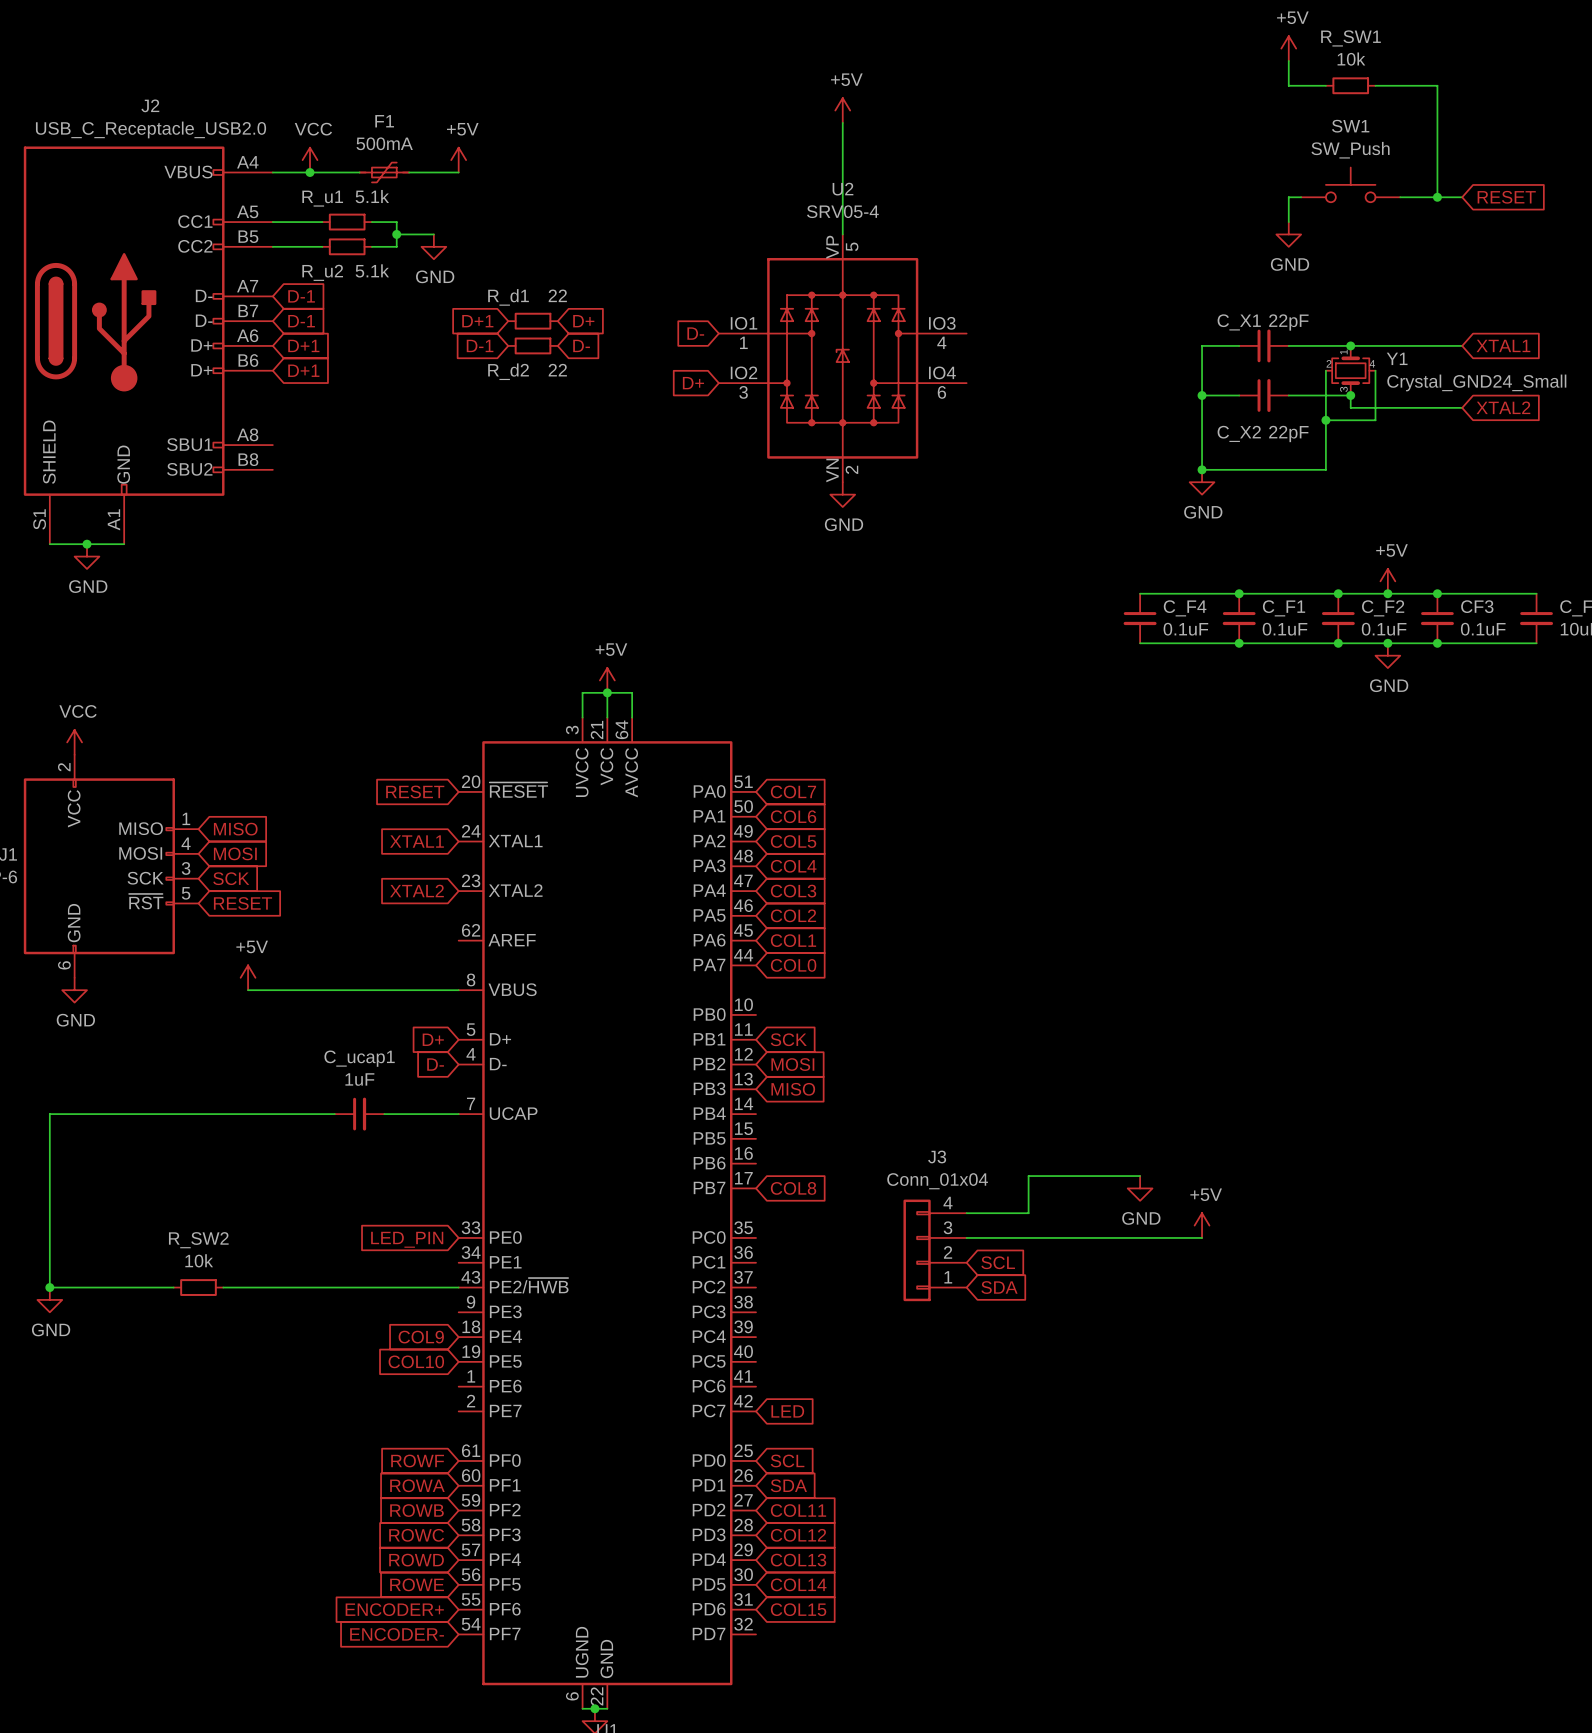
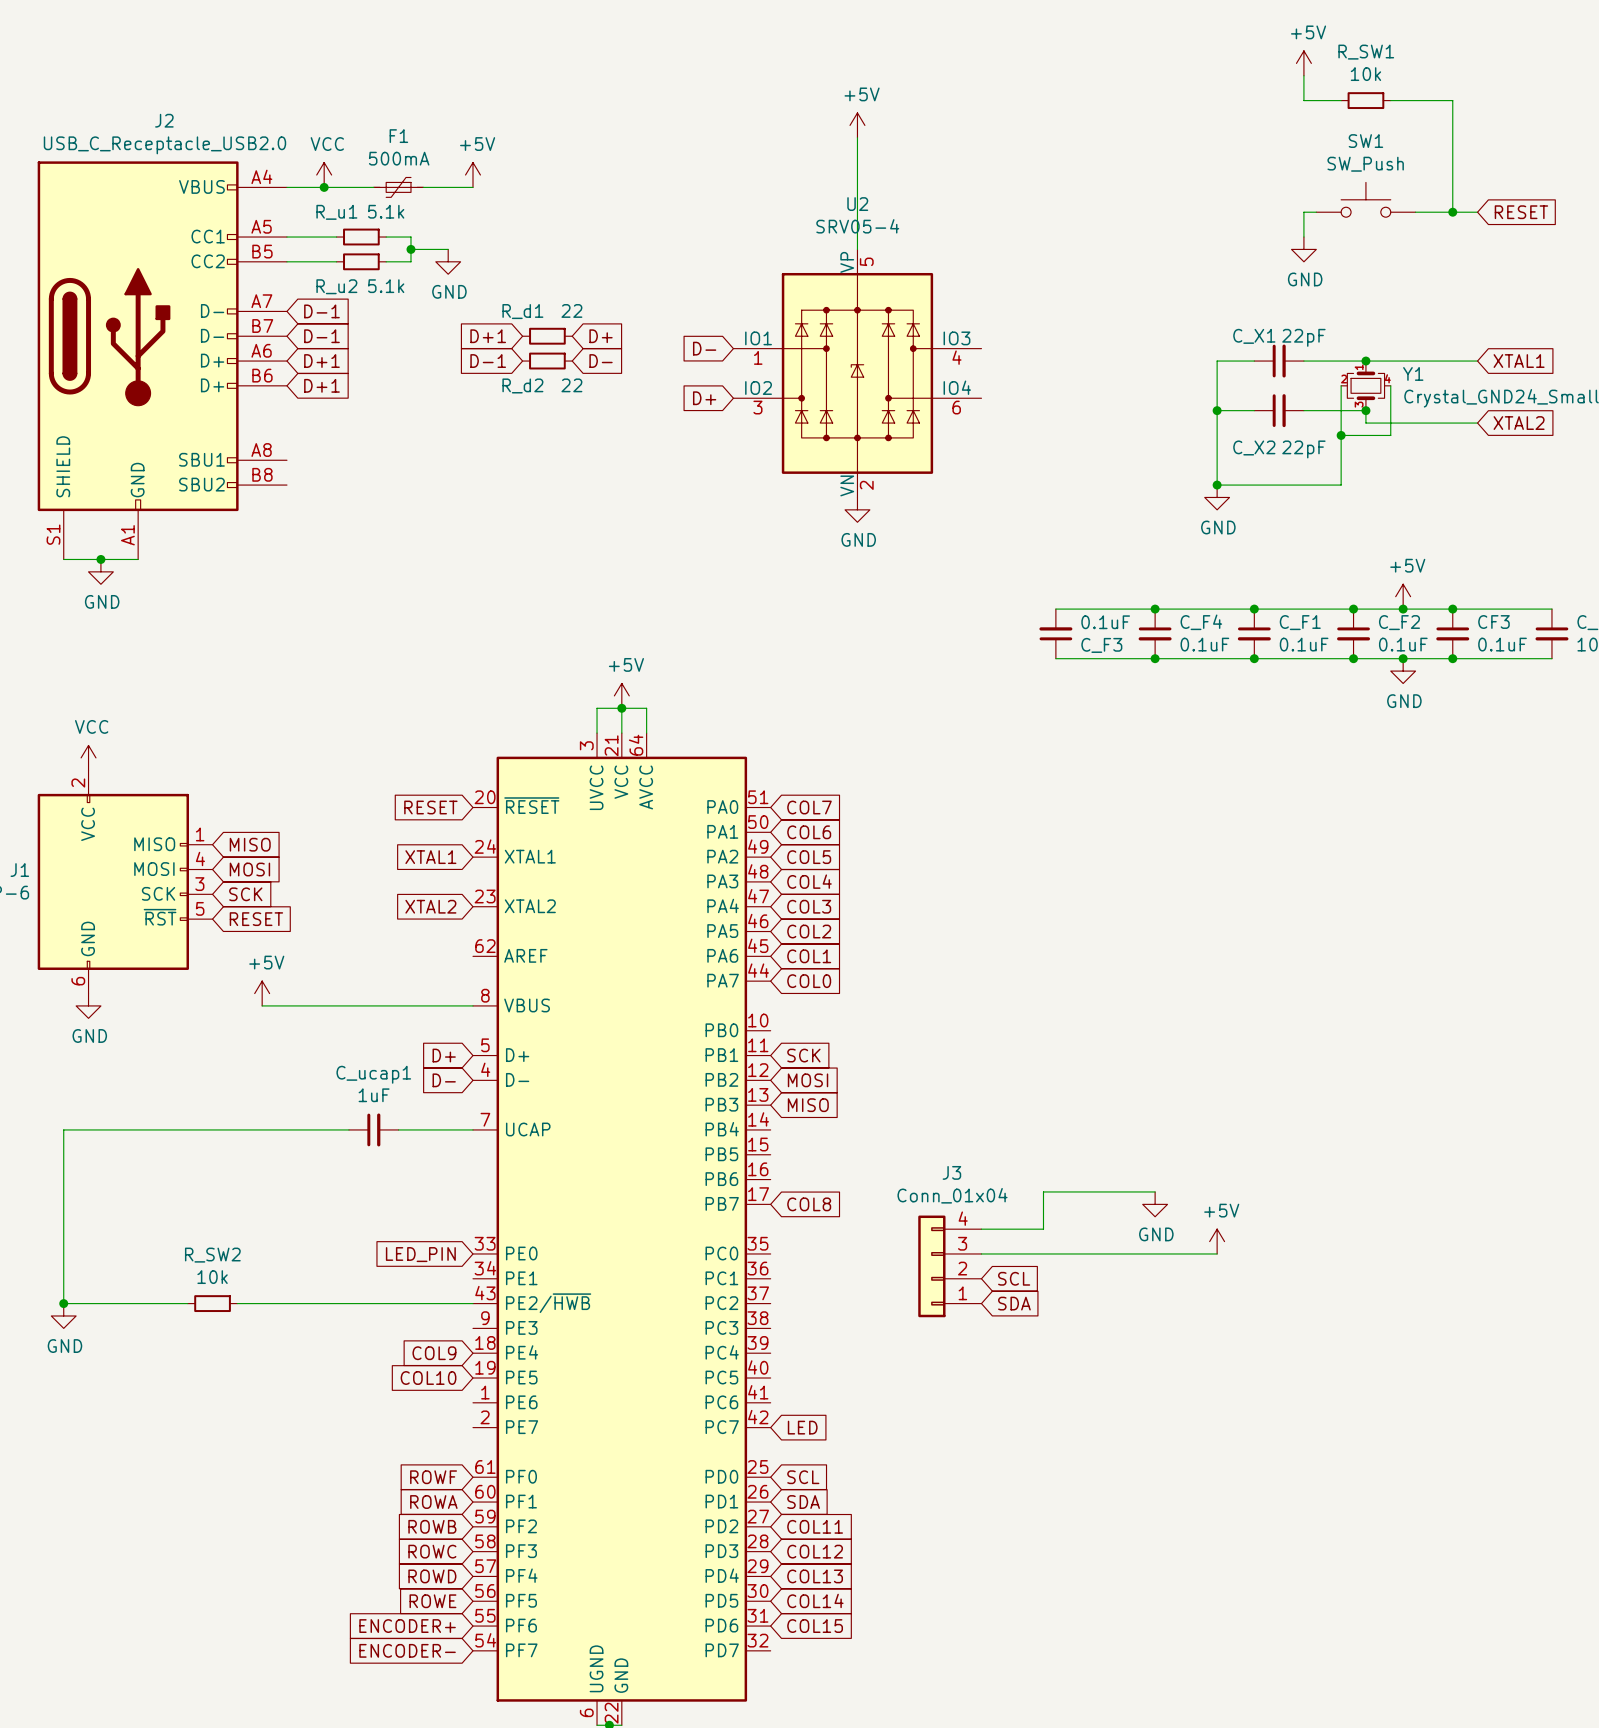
wire: none -> (1055, 609) (1155, 609)
junction: none -> (1155, 609)
C_F3: none -> 0.1uF (1055, 633)
wire: none -> (1055, 658) (1155, 658)
junction: none -> (1155, 658)

